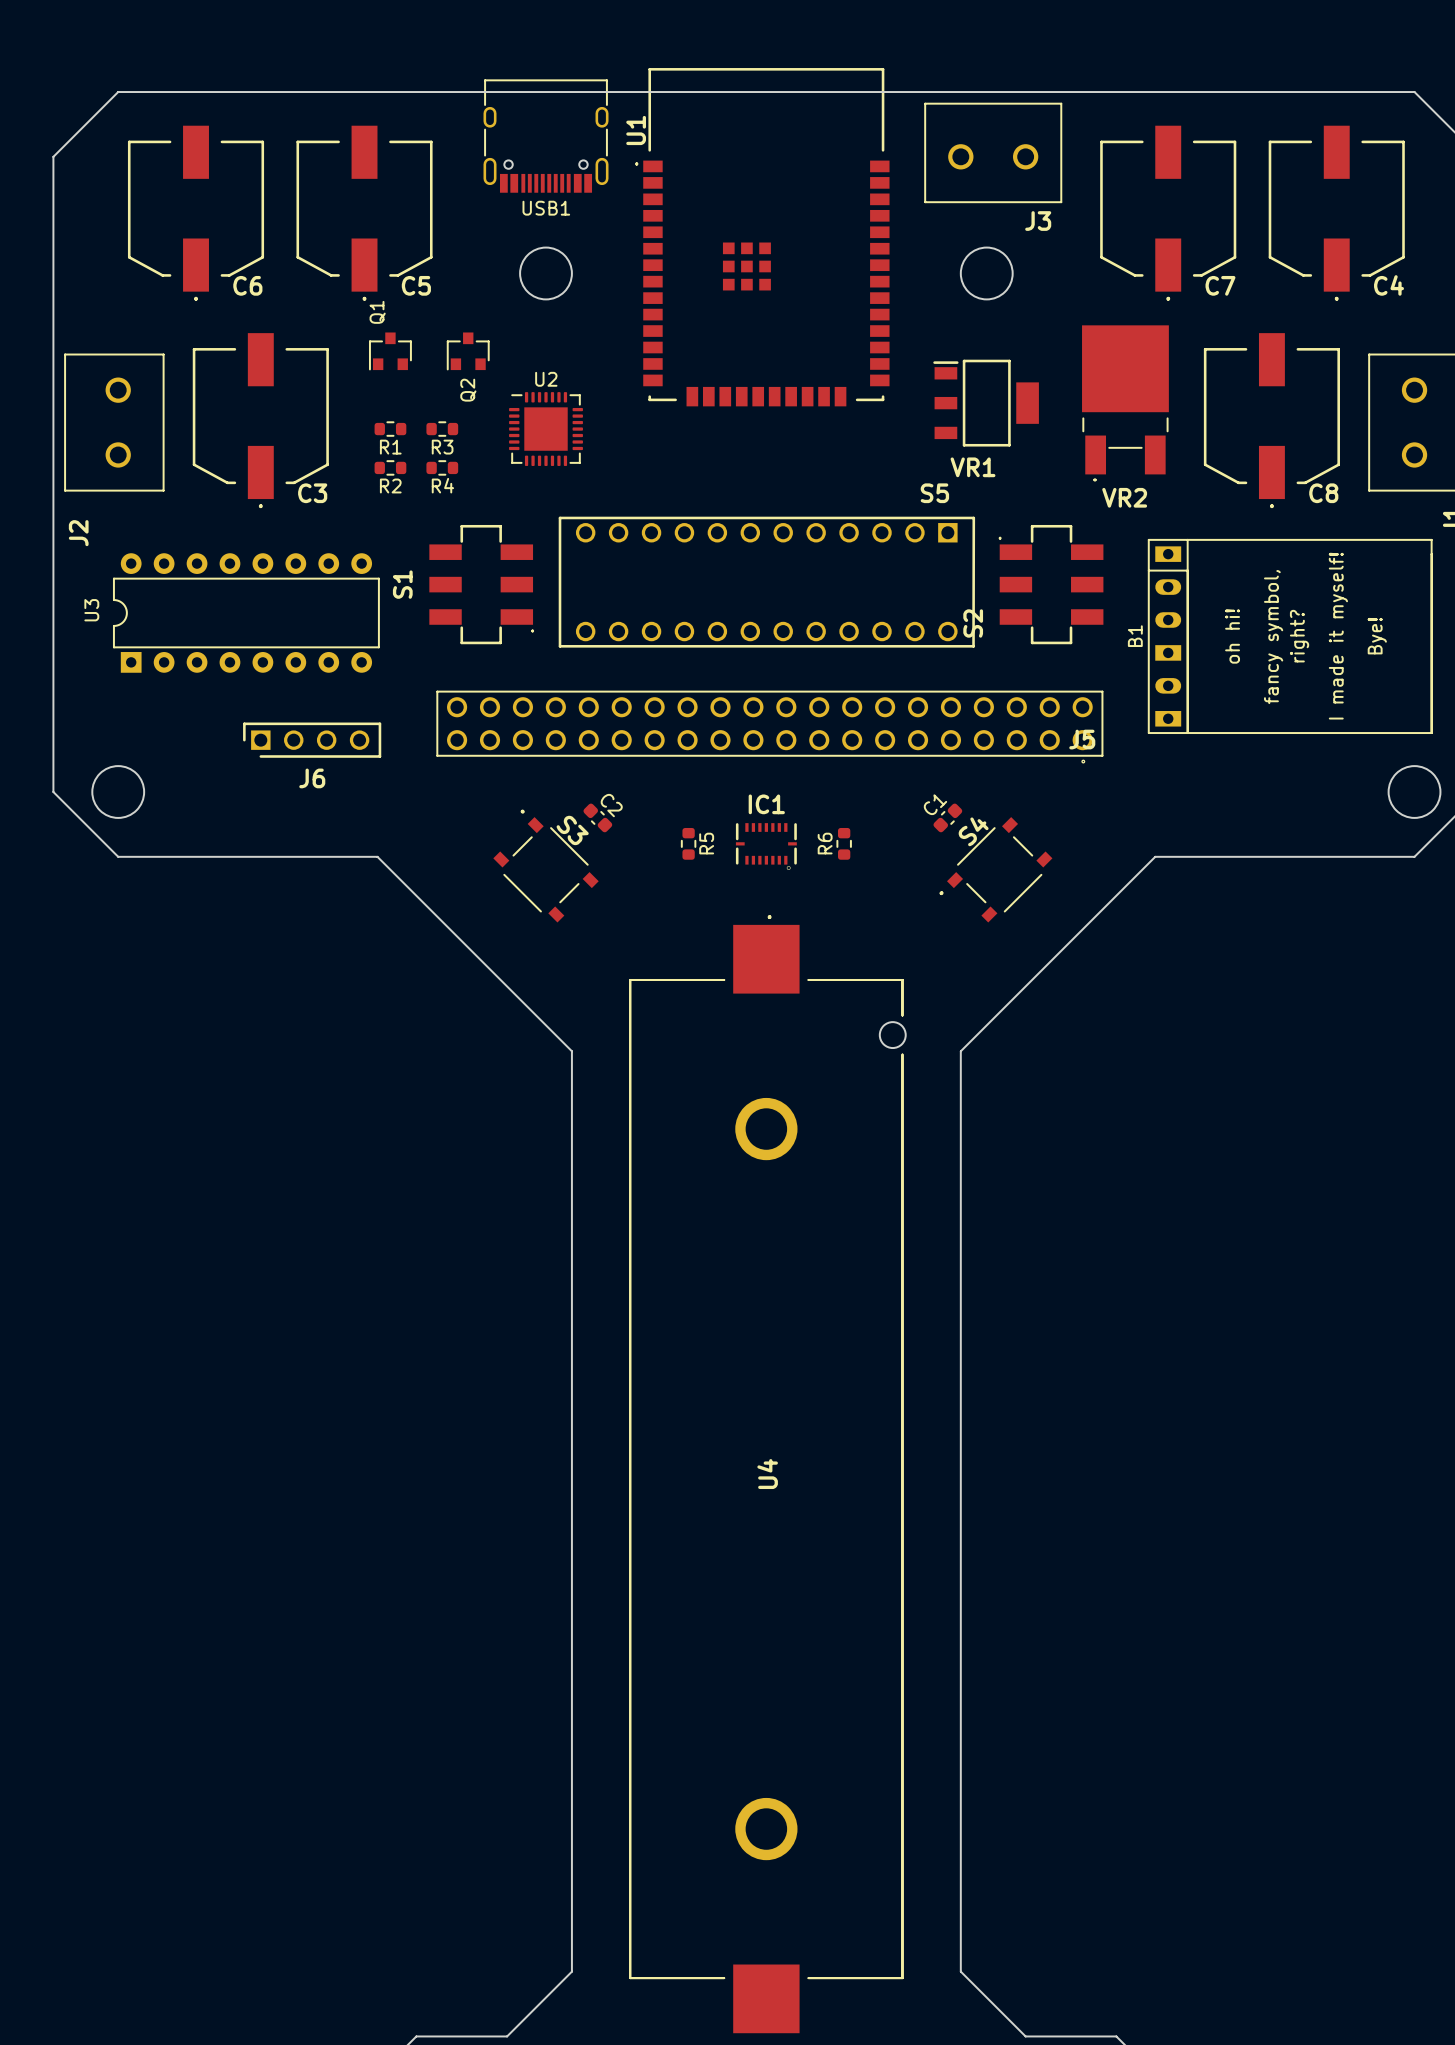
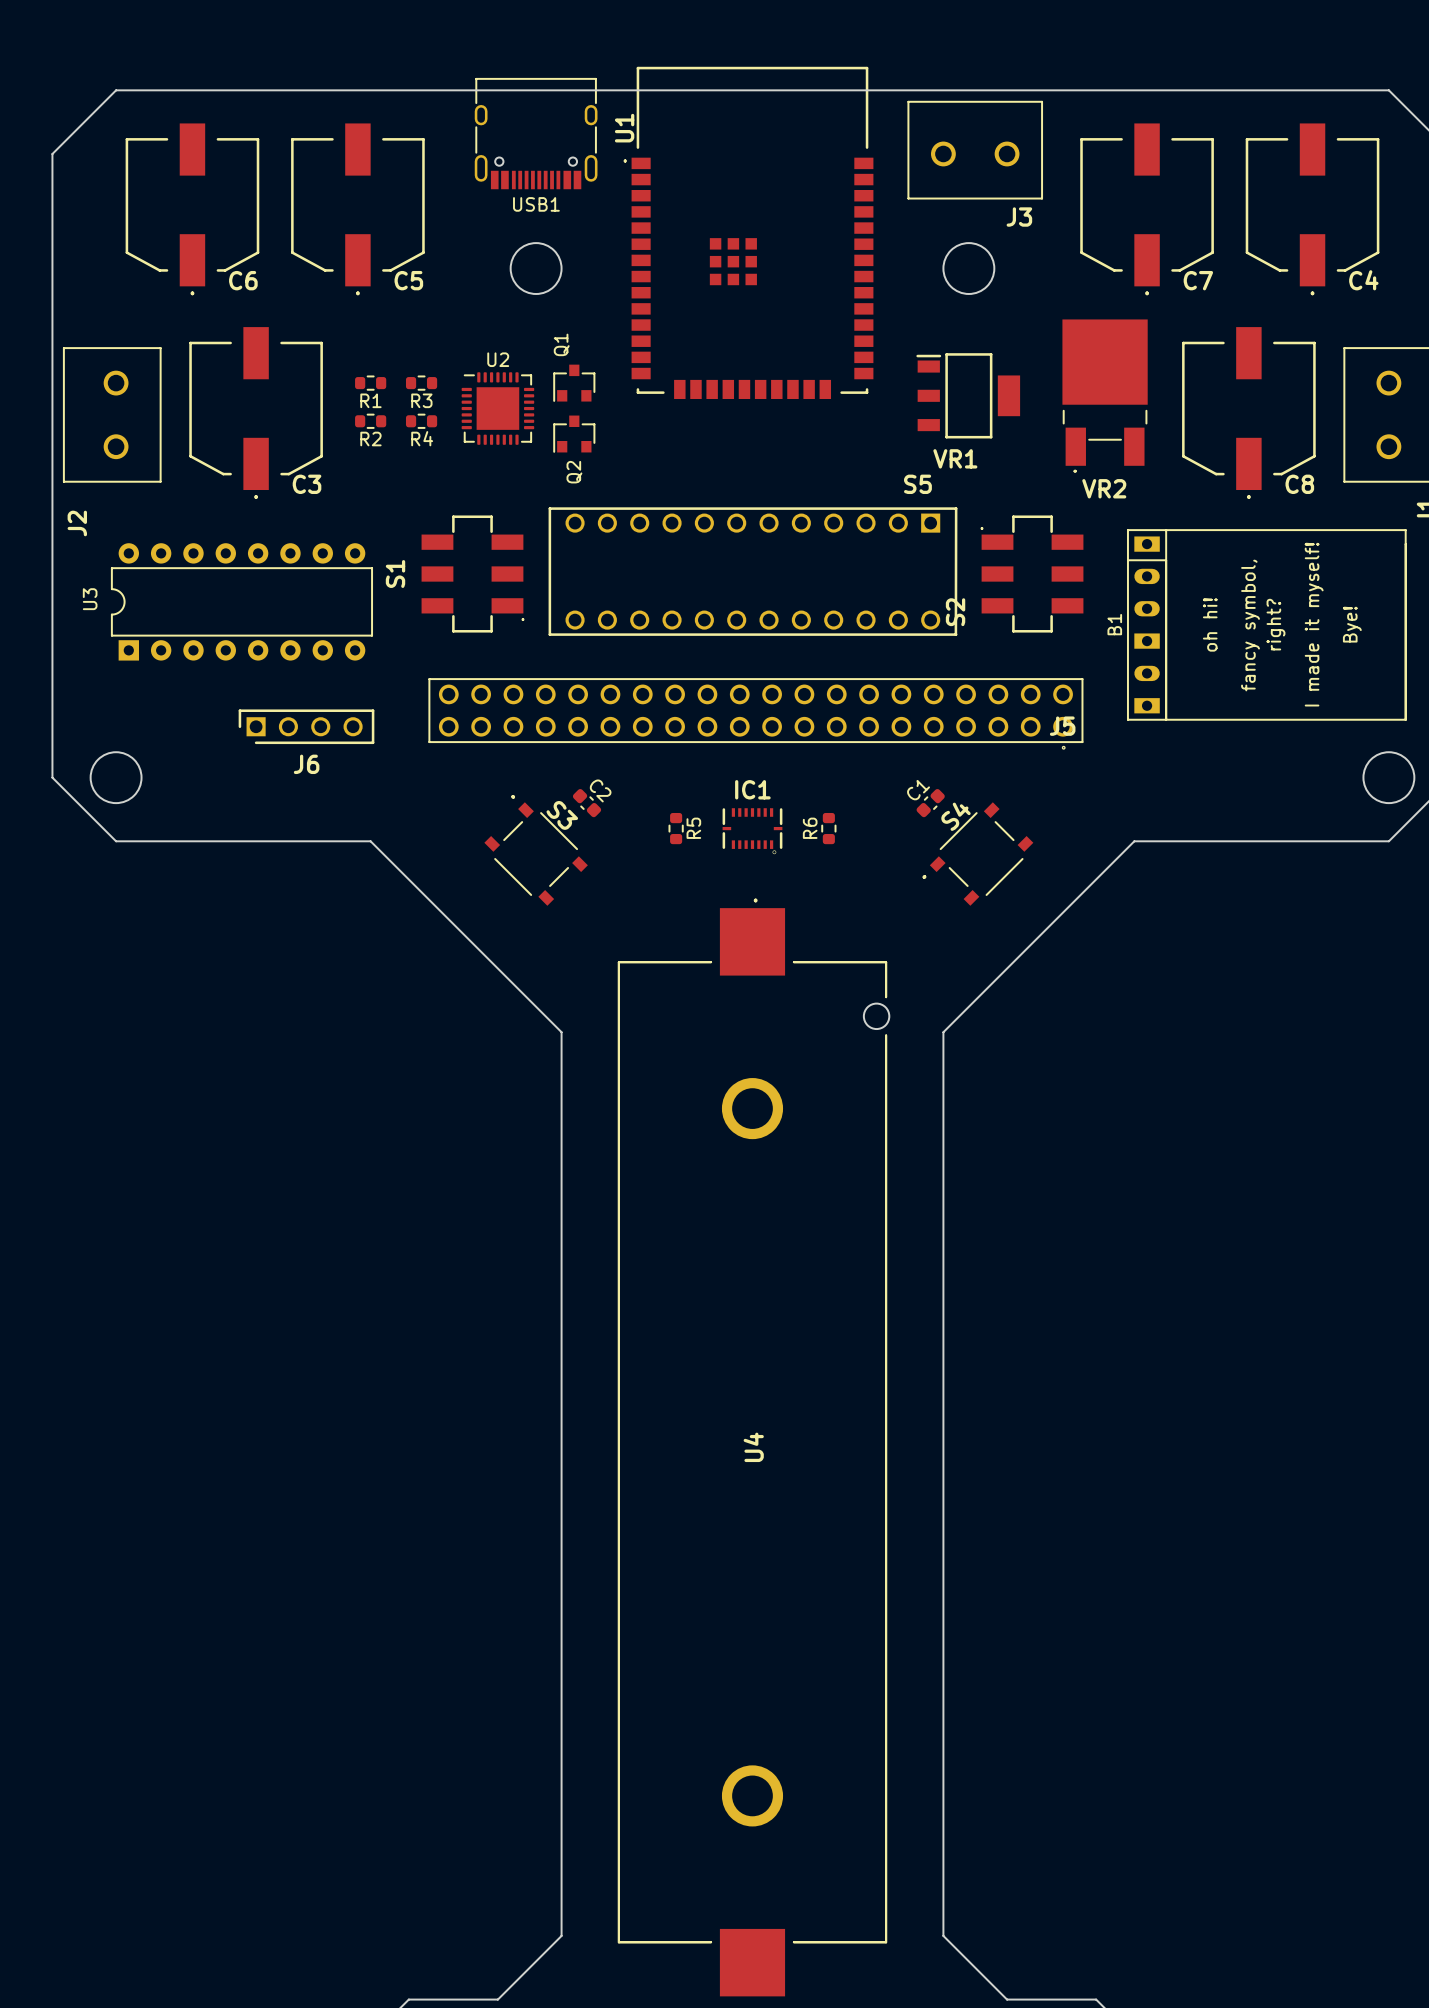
Q1 position: (390, 351) -> (574, 383)
Q2 position: (468, 351) -> (574, 434)
R1 position: (390, 429) -> (370, 383)
R3 position: (442, 429) -> (421, 383)
U2 position: (546, 429) -> (497, 408)
R2 position: (390, 467) -> (370, 421)
R4 position: (442, 467) -> (421, 421)

